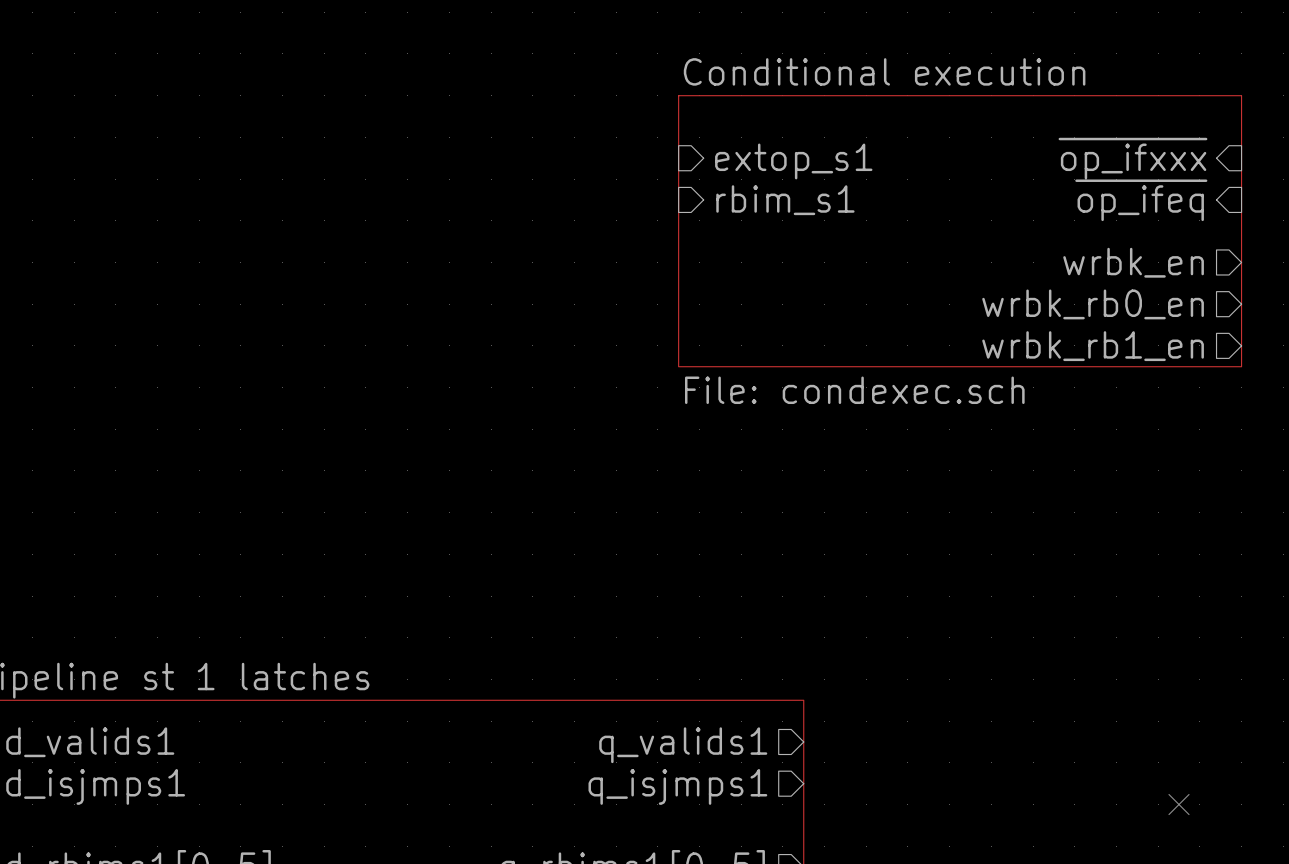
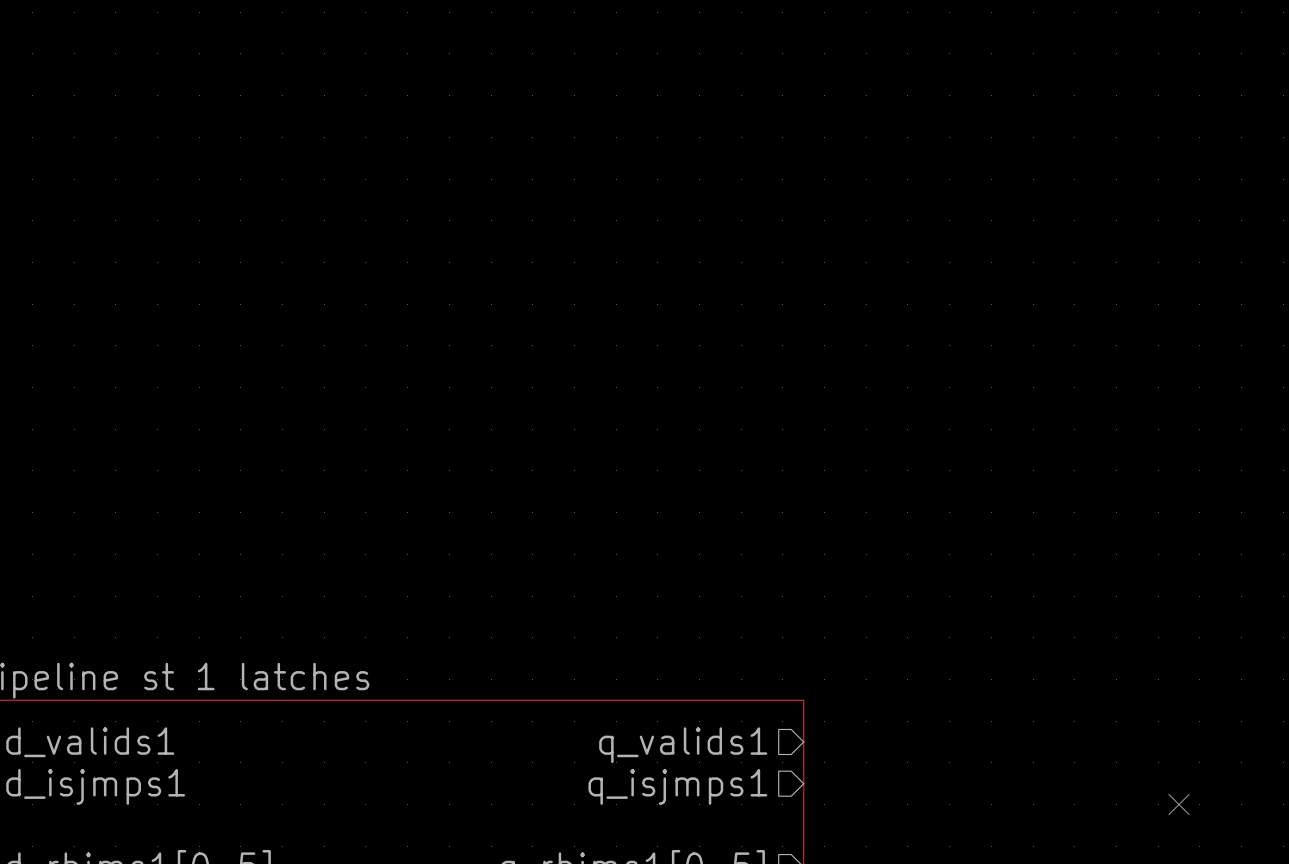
sheet pin: ~{op_ifxxx} (1132, 158) -> none
sheet pin: extop_s1 (793, 161) -> none
sheet pin: rbim_s1 (785, 200) -> none
sheet pin: ~{op_ifeq} (1141, 200) -> none
sheet Conditional execution: File: condexec.sch (960, 231) -> none
sheet pin: wrbk_en (1133, 262) -> none
sheet pin: wrbk_rb0_en (1093, 304) -> none
sheet pin: wrbk_rb1_en (1093, 346) -> none

